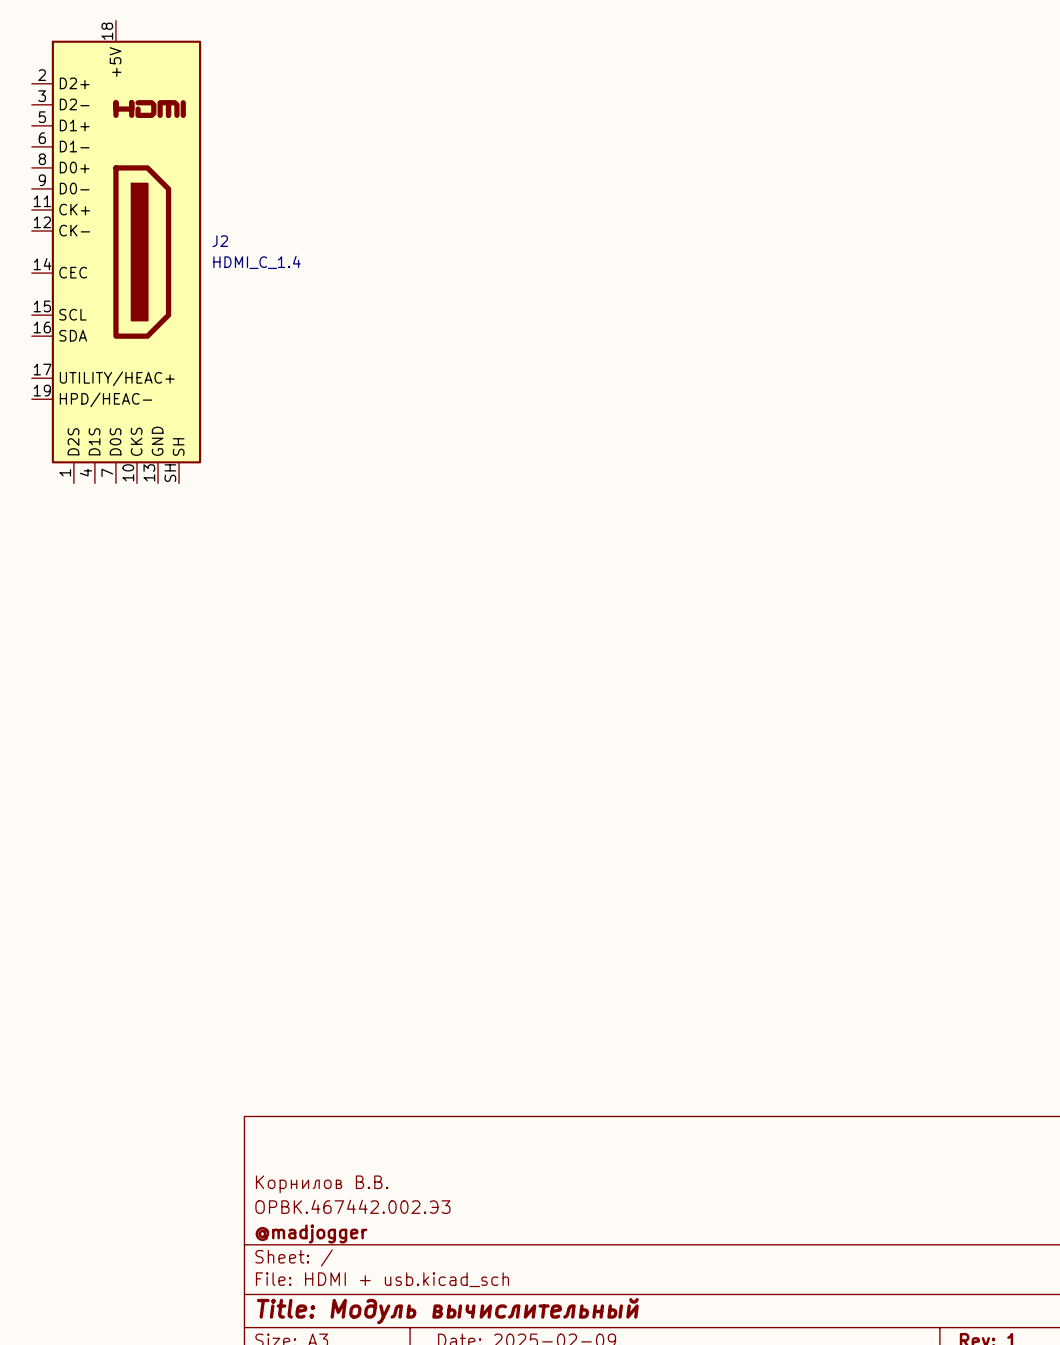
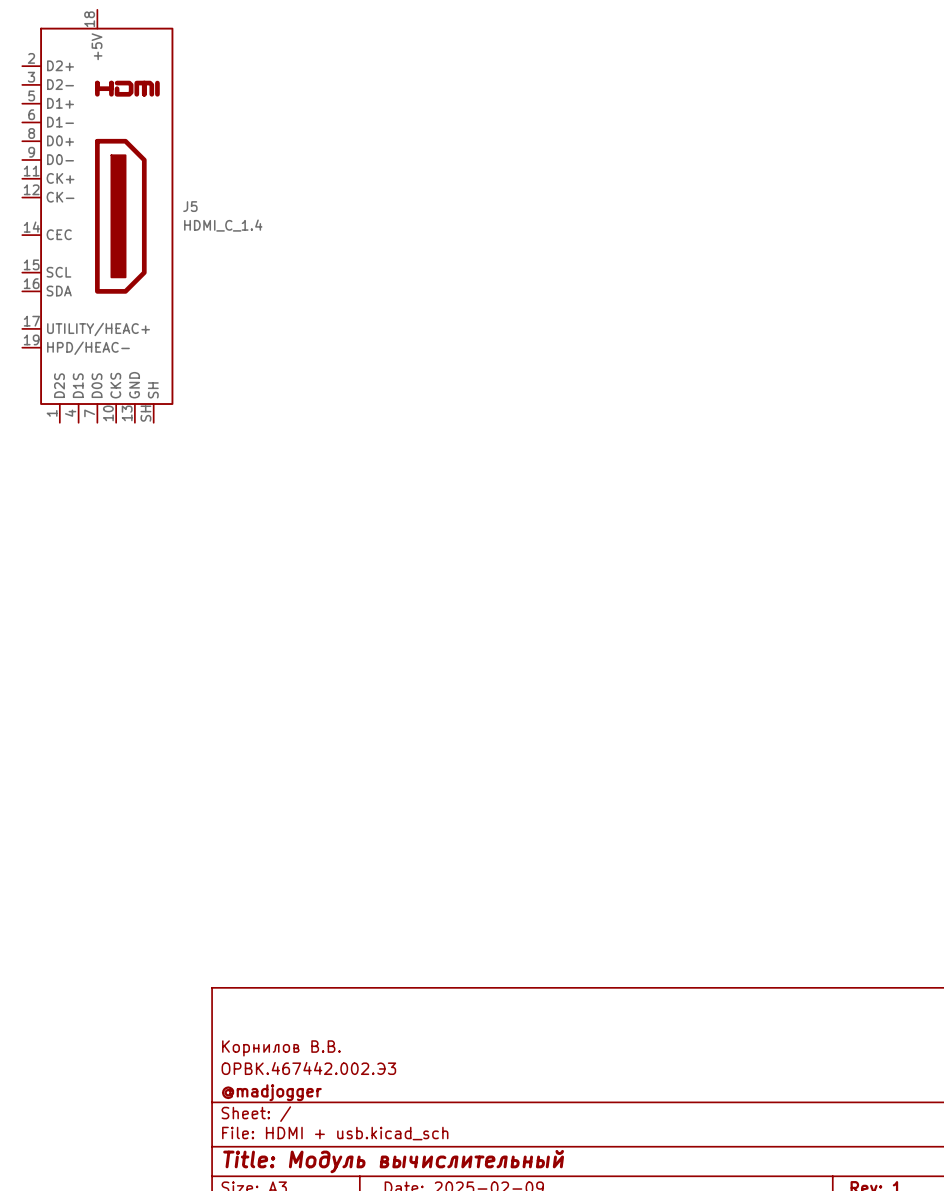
J2 name: J2 (220, 241) -> J5 (190, 206)

